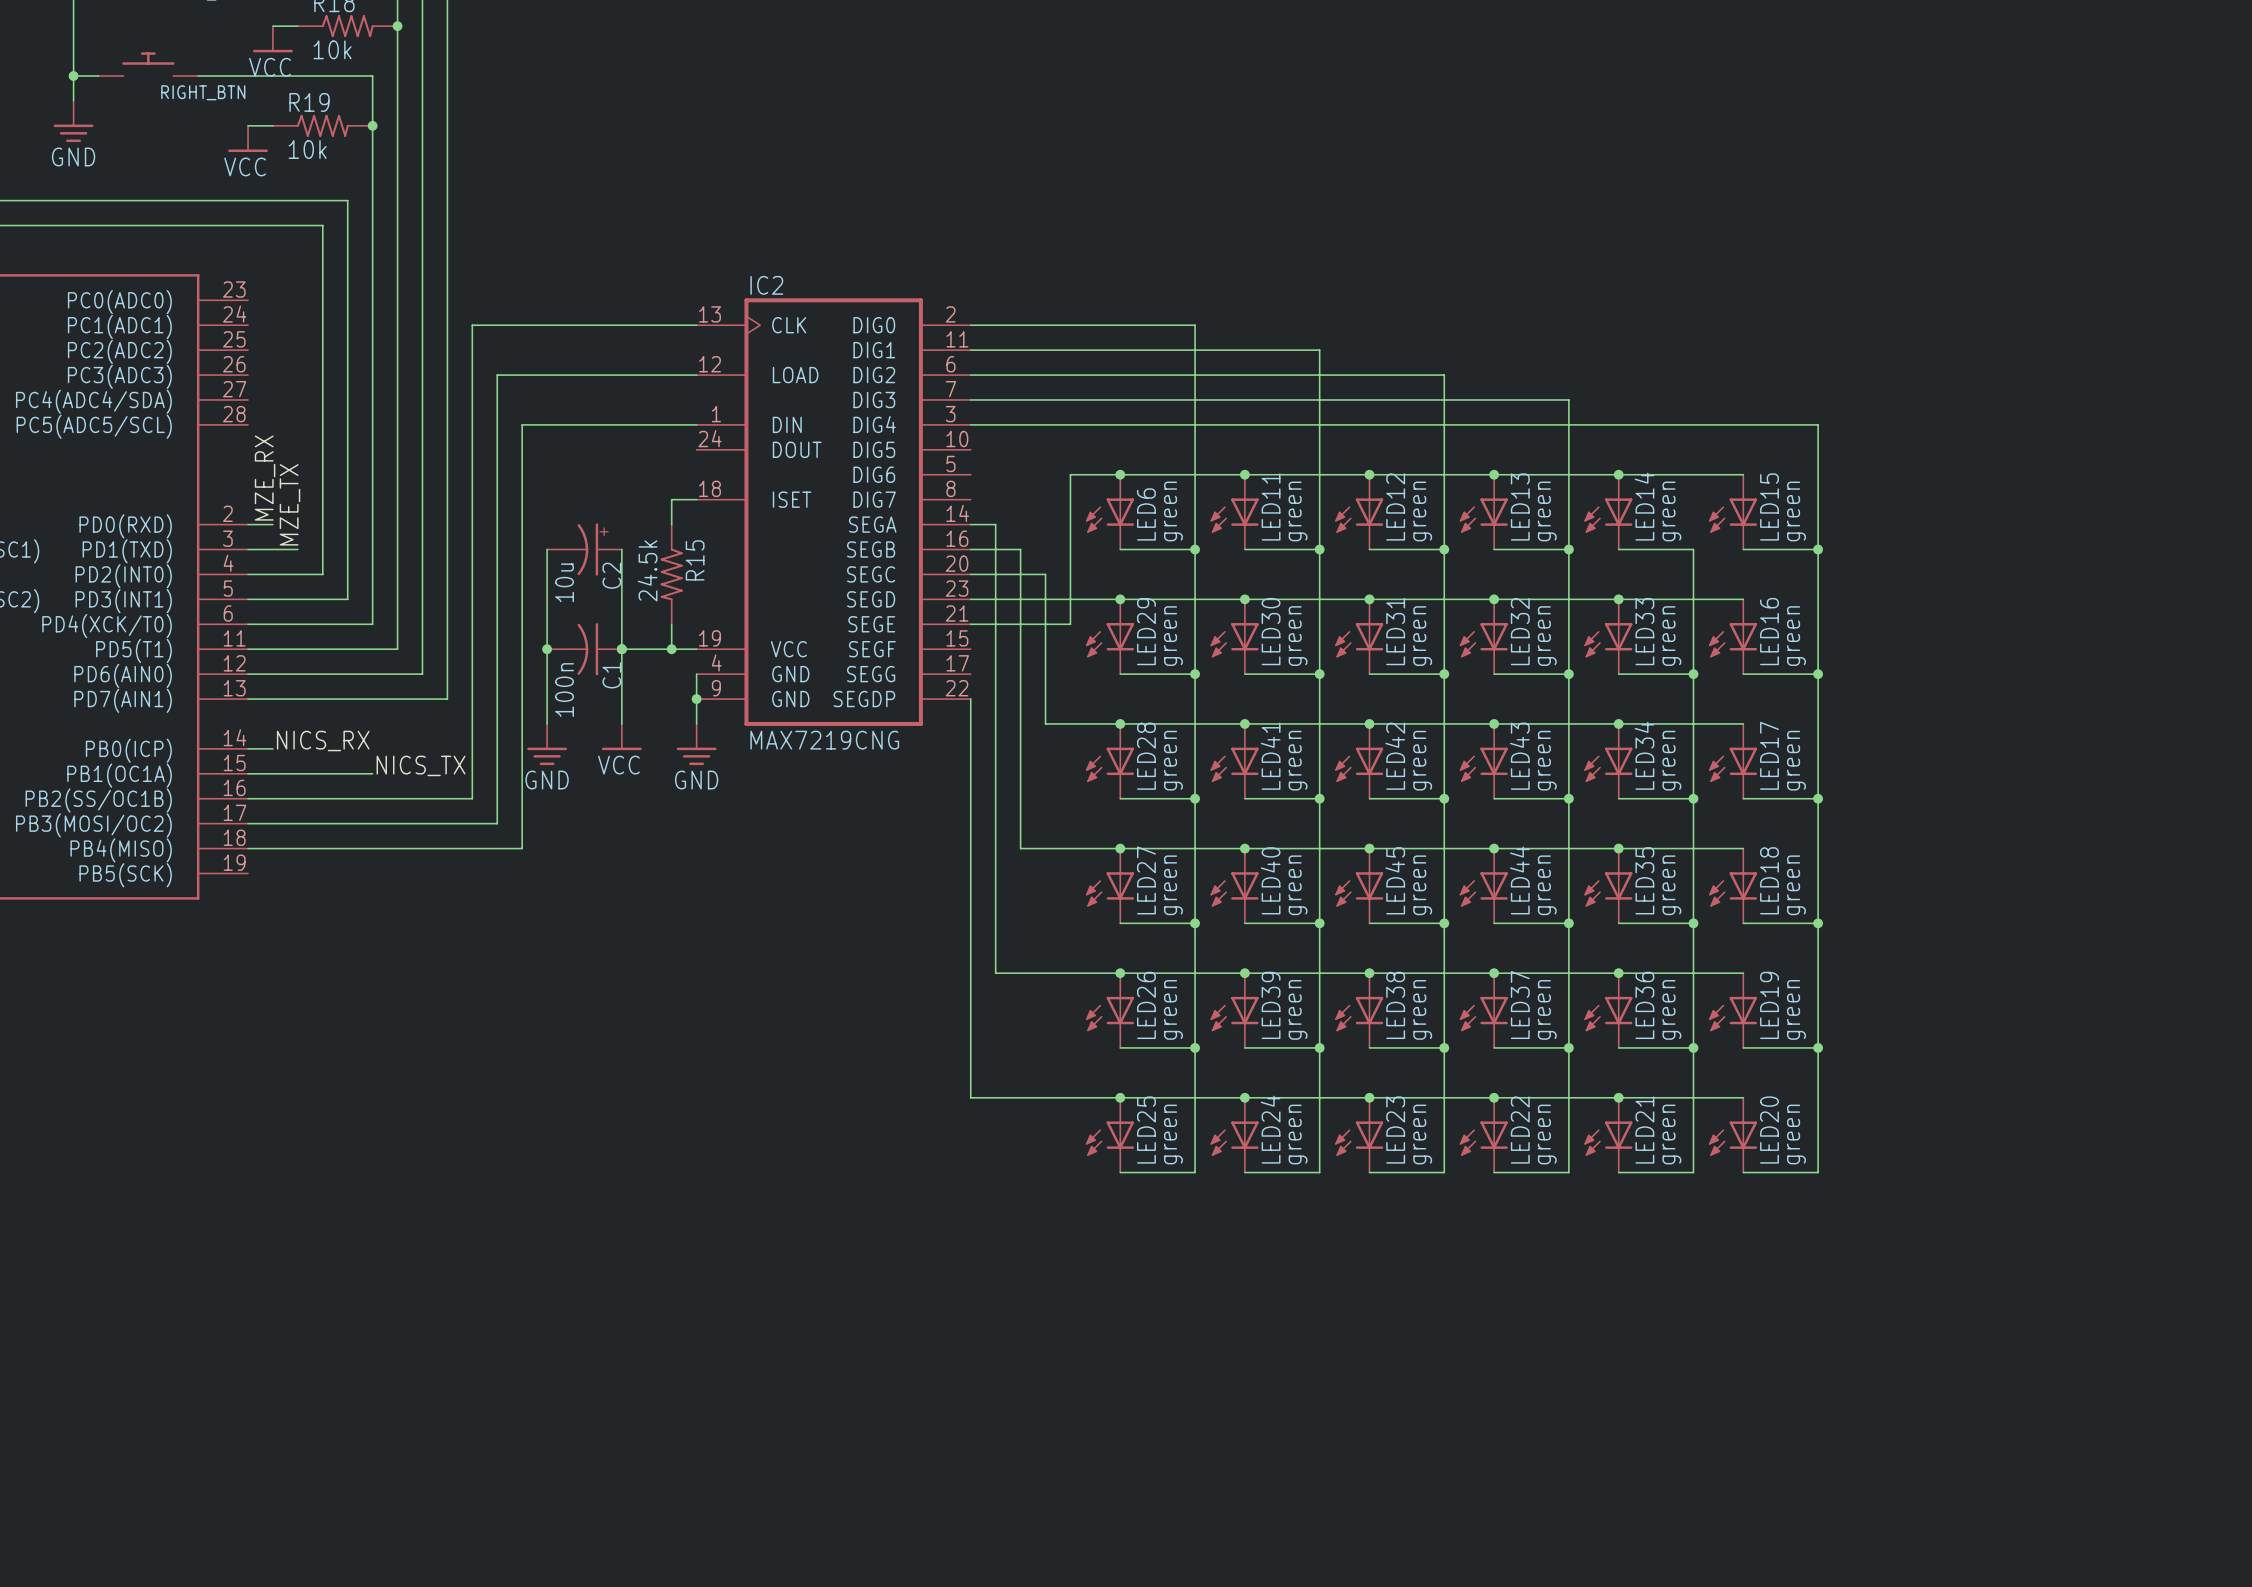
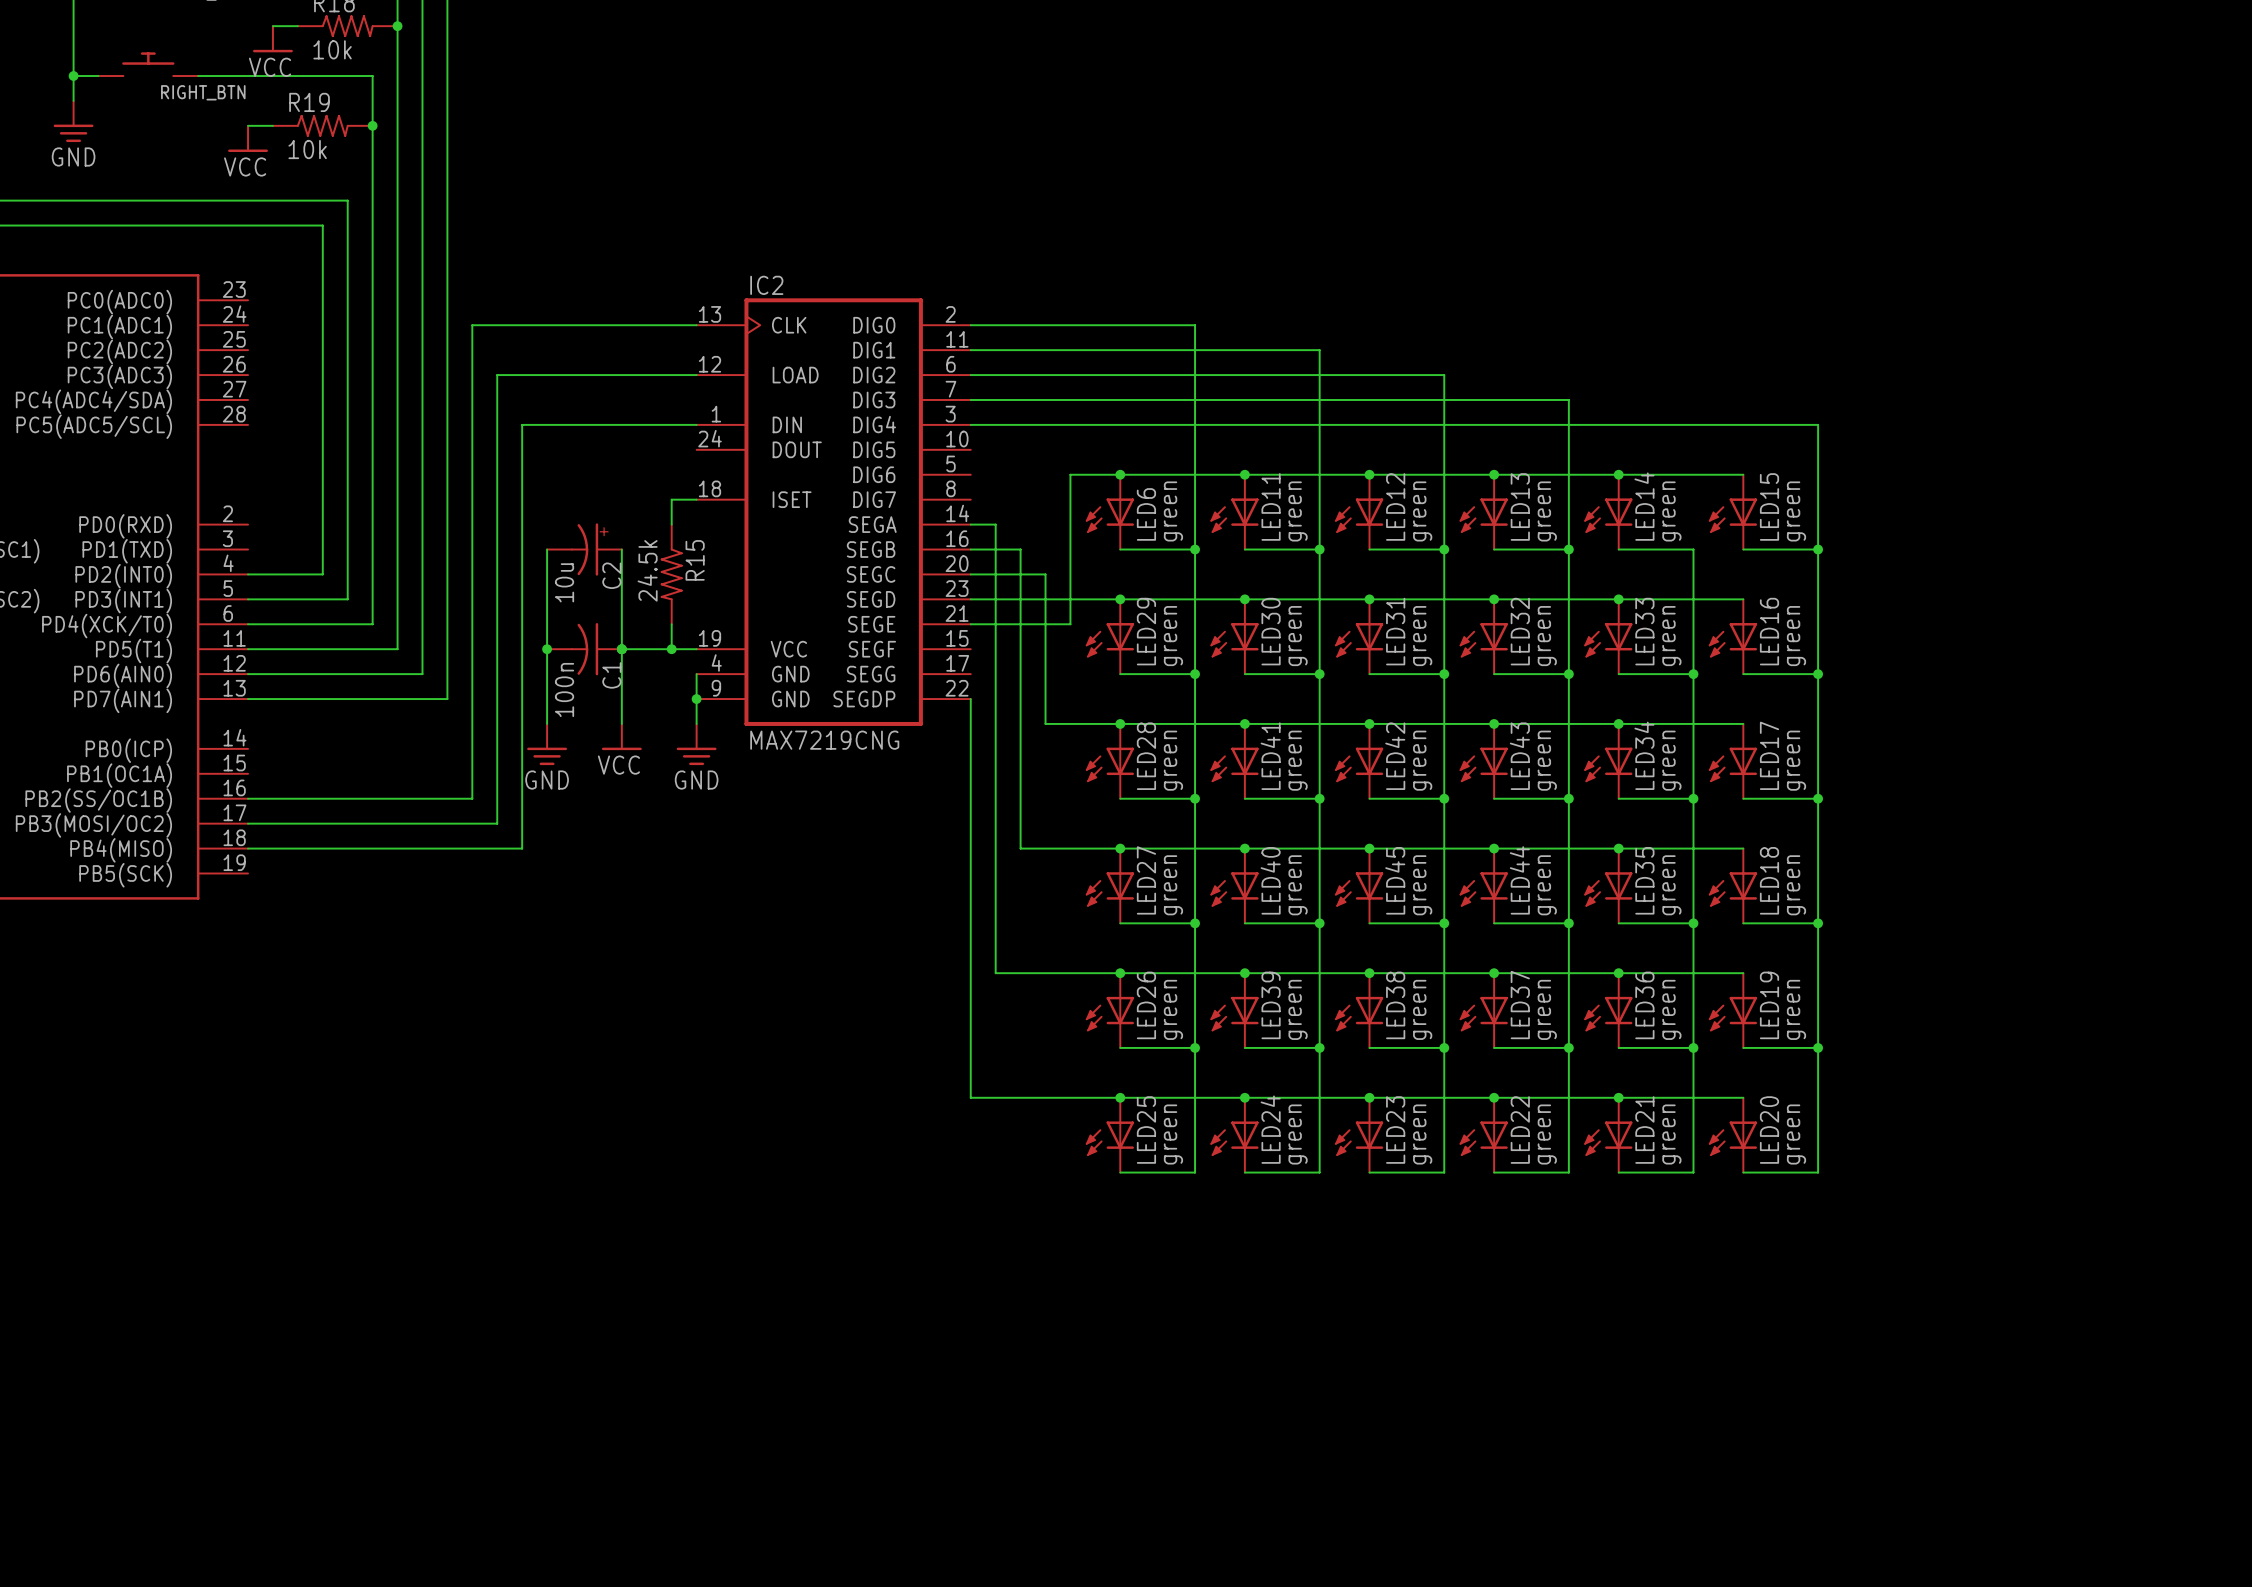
label: MZE_RX (265, 478) -> none
label: MZE_TX (289, 504) -> none
wire: (248, 524) (272, 524) -> none
wire: (248, 549) (297, 549) -> none
label: NICS_RX (323, 740) -> none
wire: (248, 748) (272, 748) -> none
label: NICS_TX (421, 765) -> none
wire: (248, 773) (372, 773) -> none

